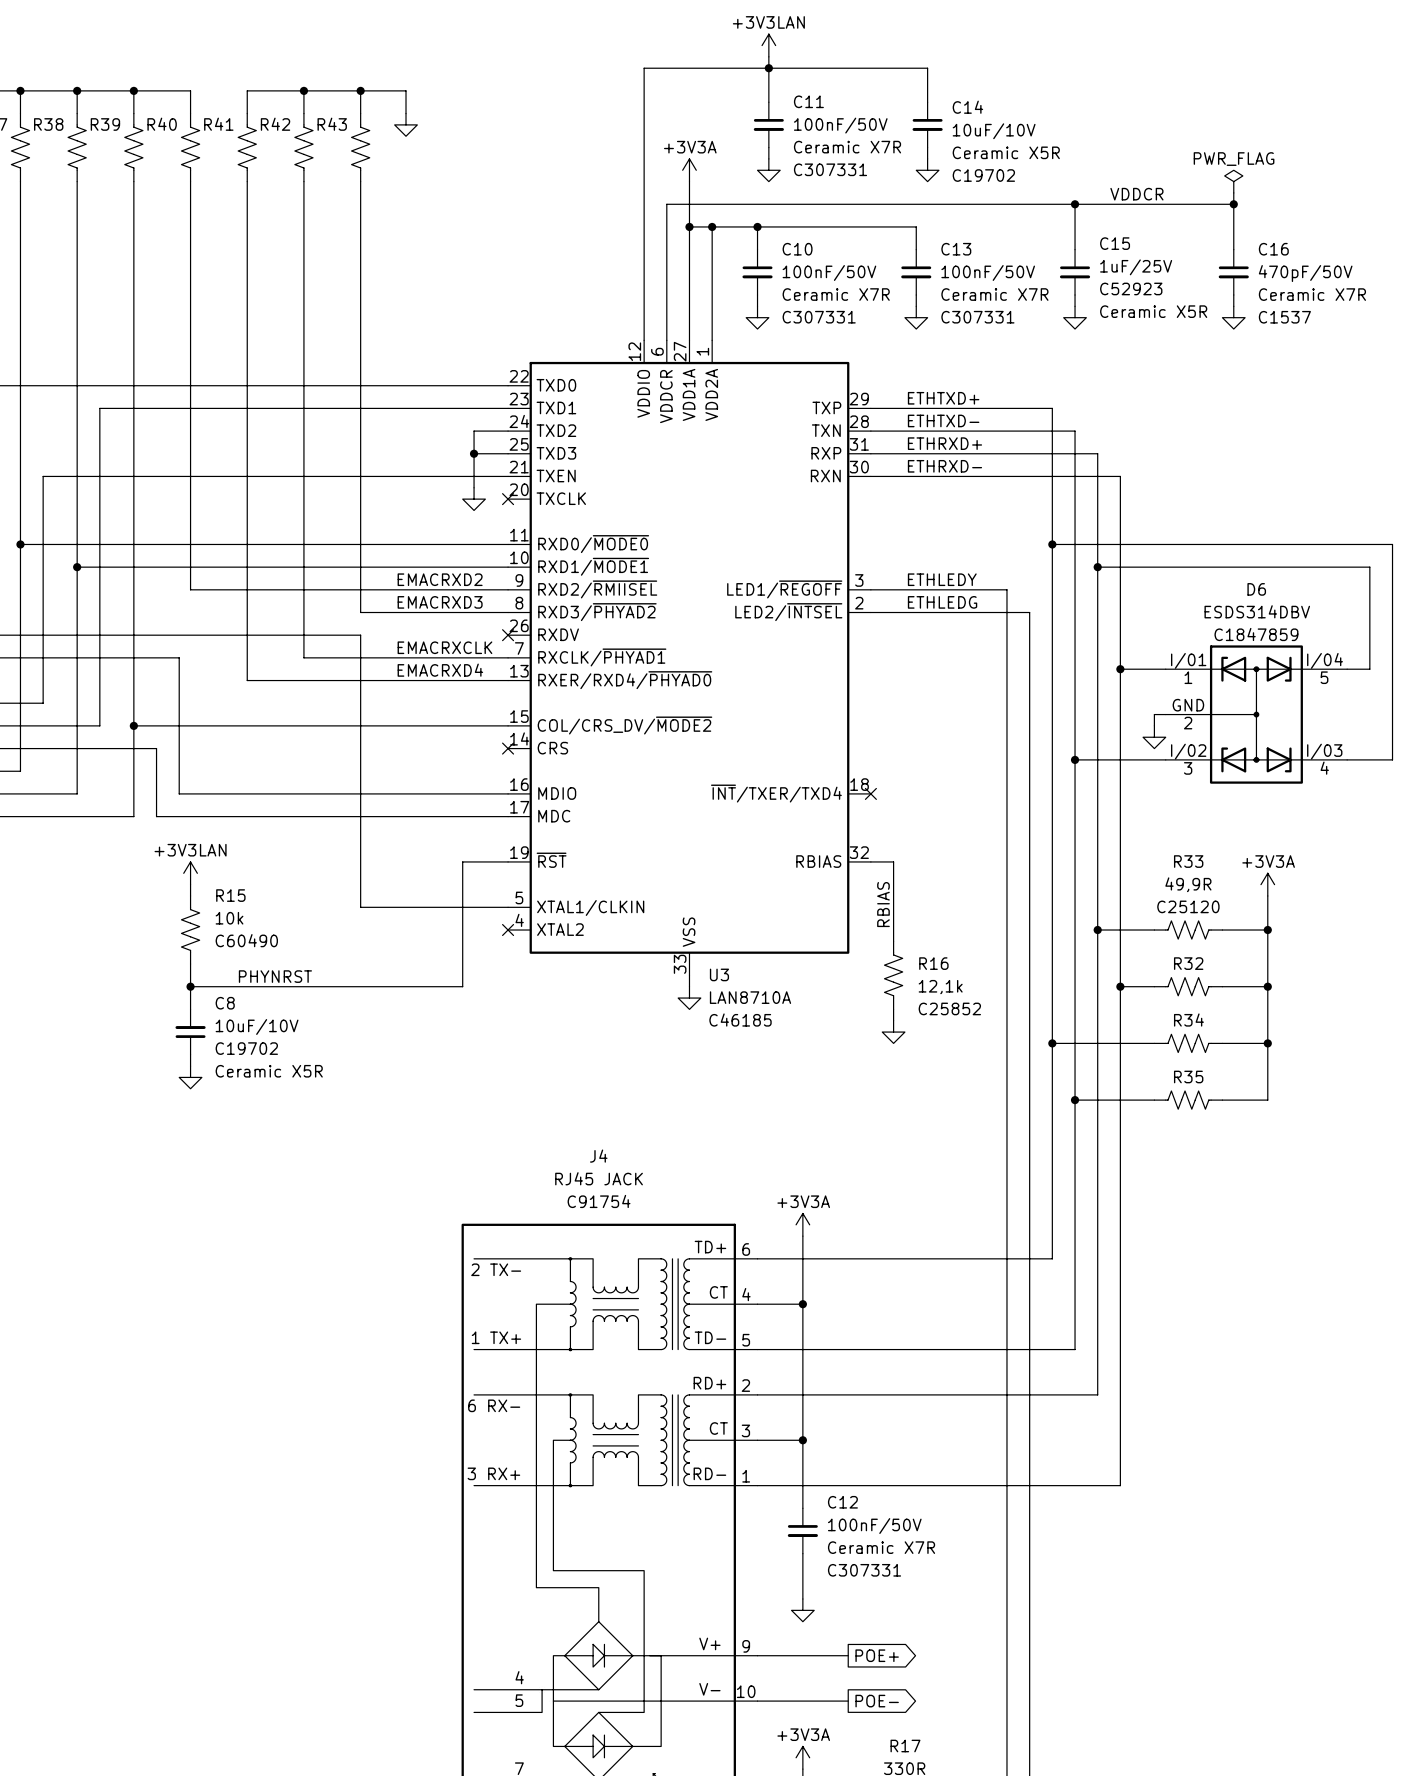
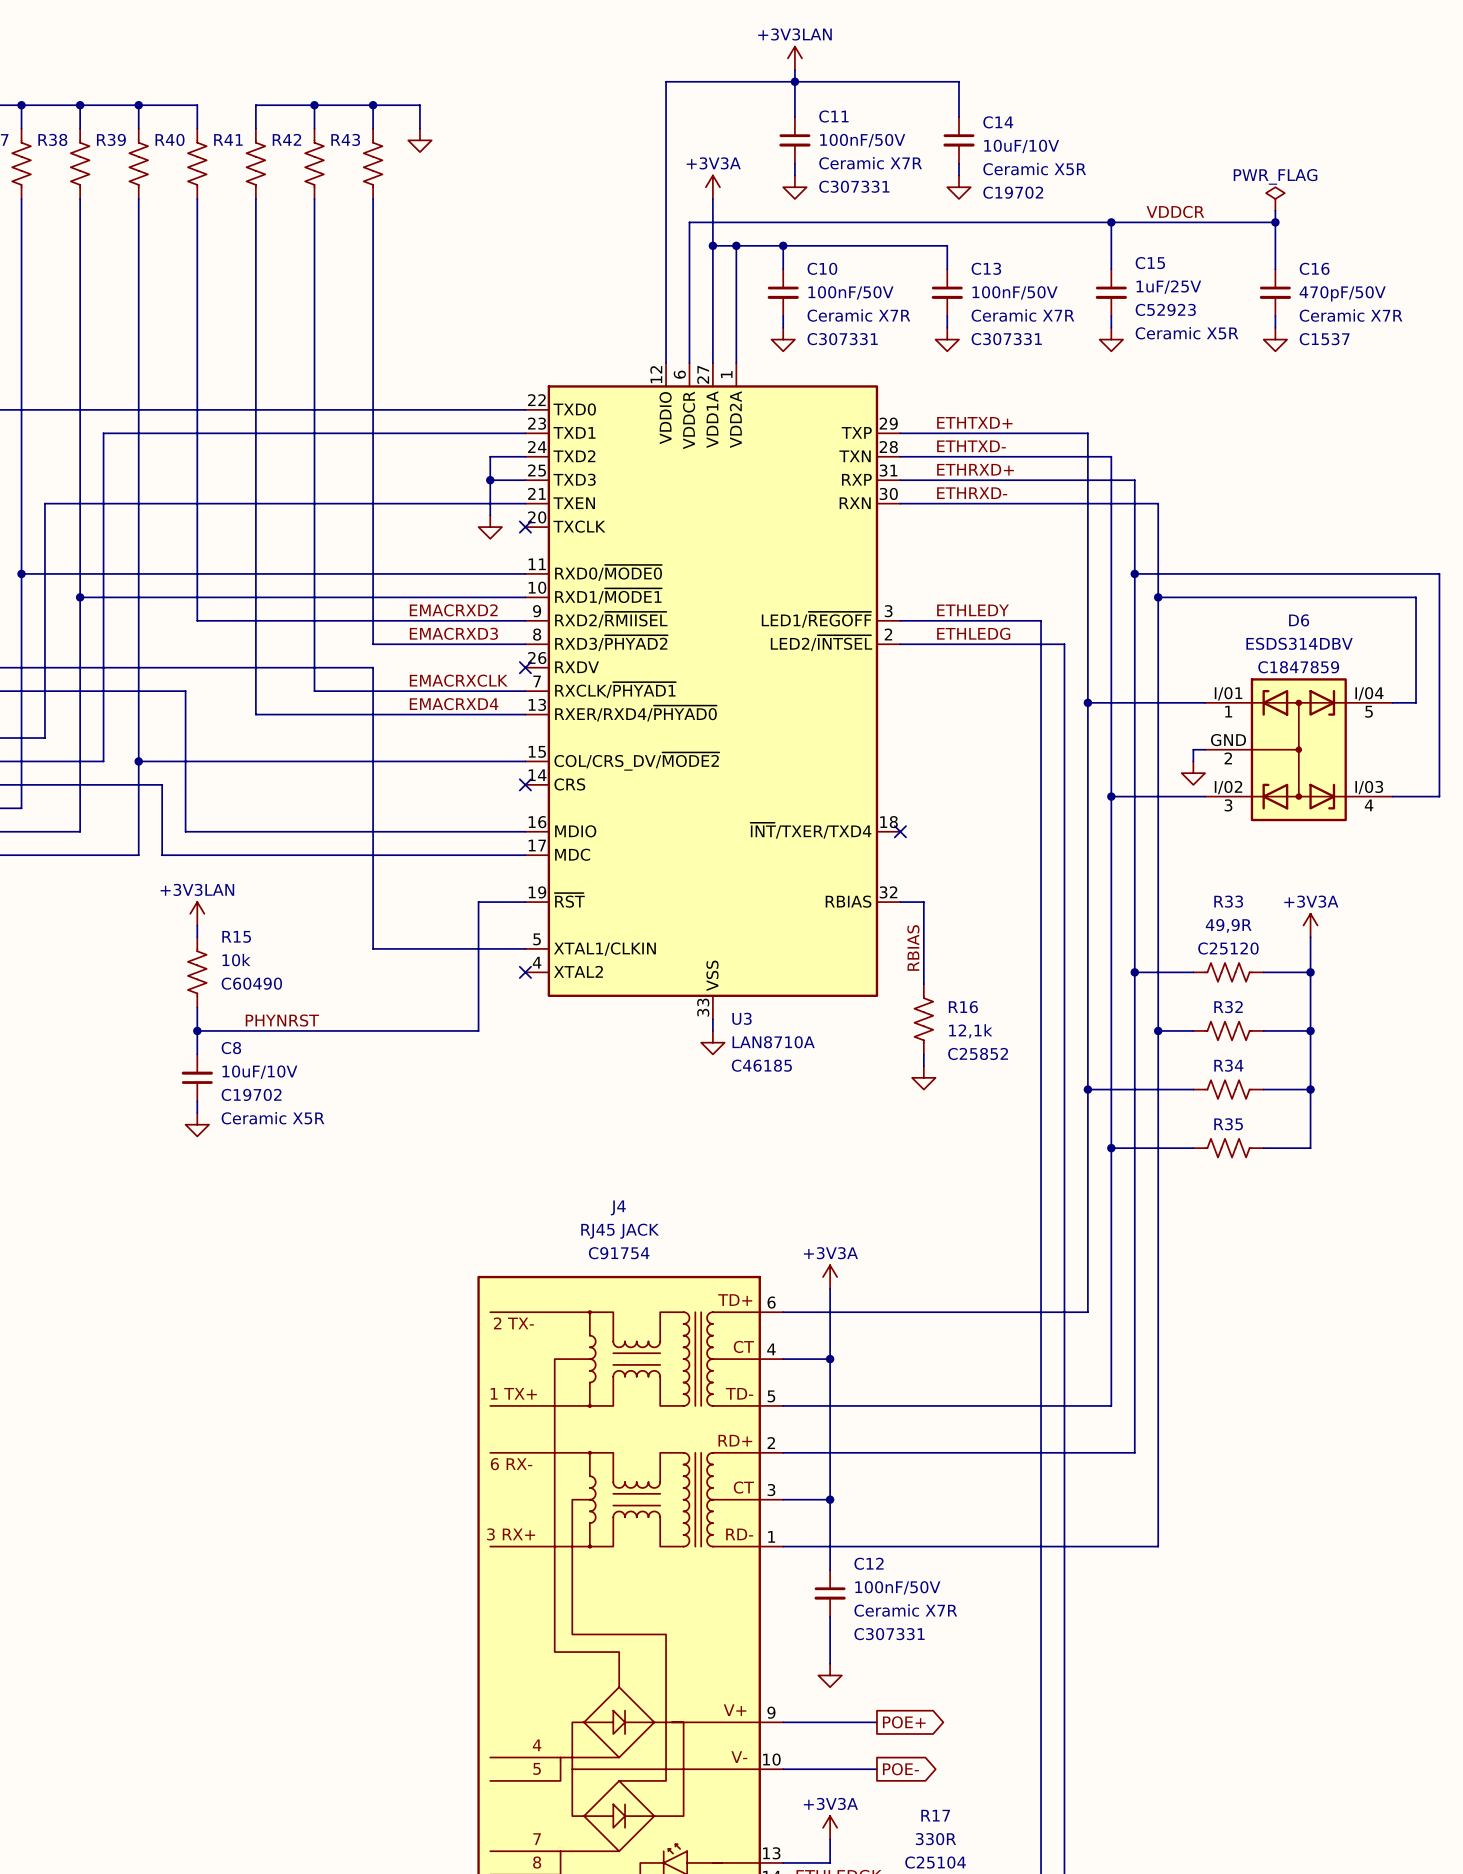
wire: (1052, 544) (1097, 544) -> none
junction: (1052, 544) -> none
junction: none -> (1134, 573)
wire: (1097, 567) (1120, 567) -> none
junction: (1097, 567) -> none
junction: none -> (1158, 597)
wire: none -> (1087, 702) (1158, 702)
junction: none -> (1087, 702)
junction: (1120, 669) -> none

